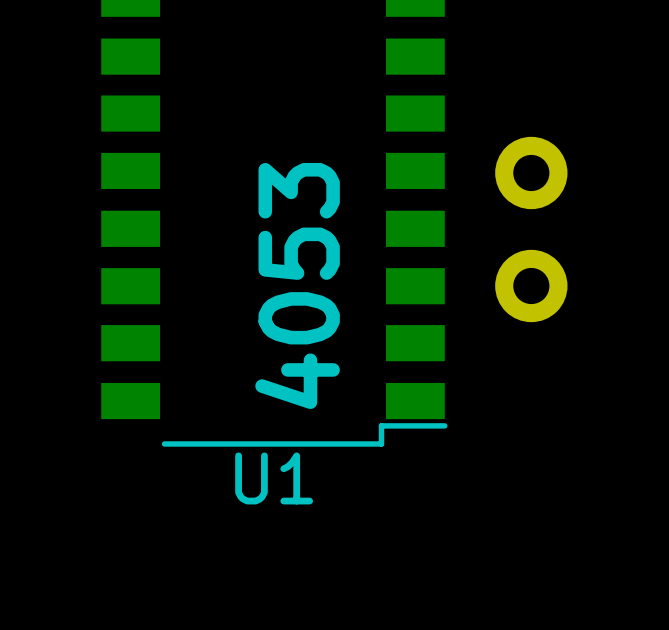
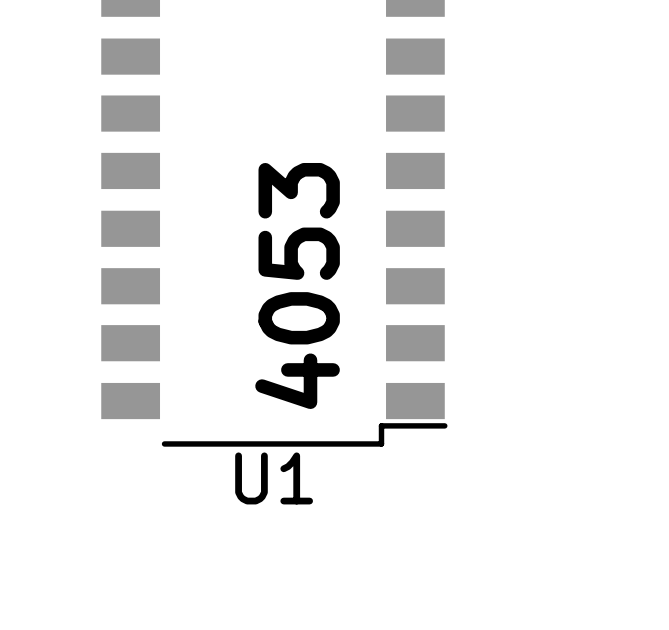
part: (531, 229) -> none

